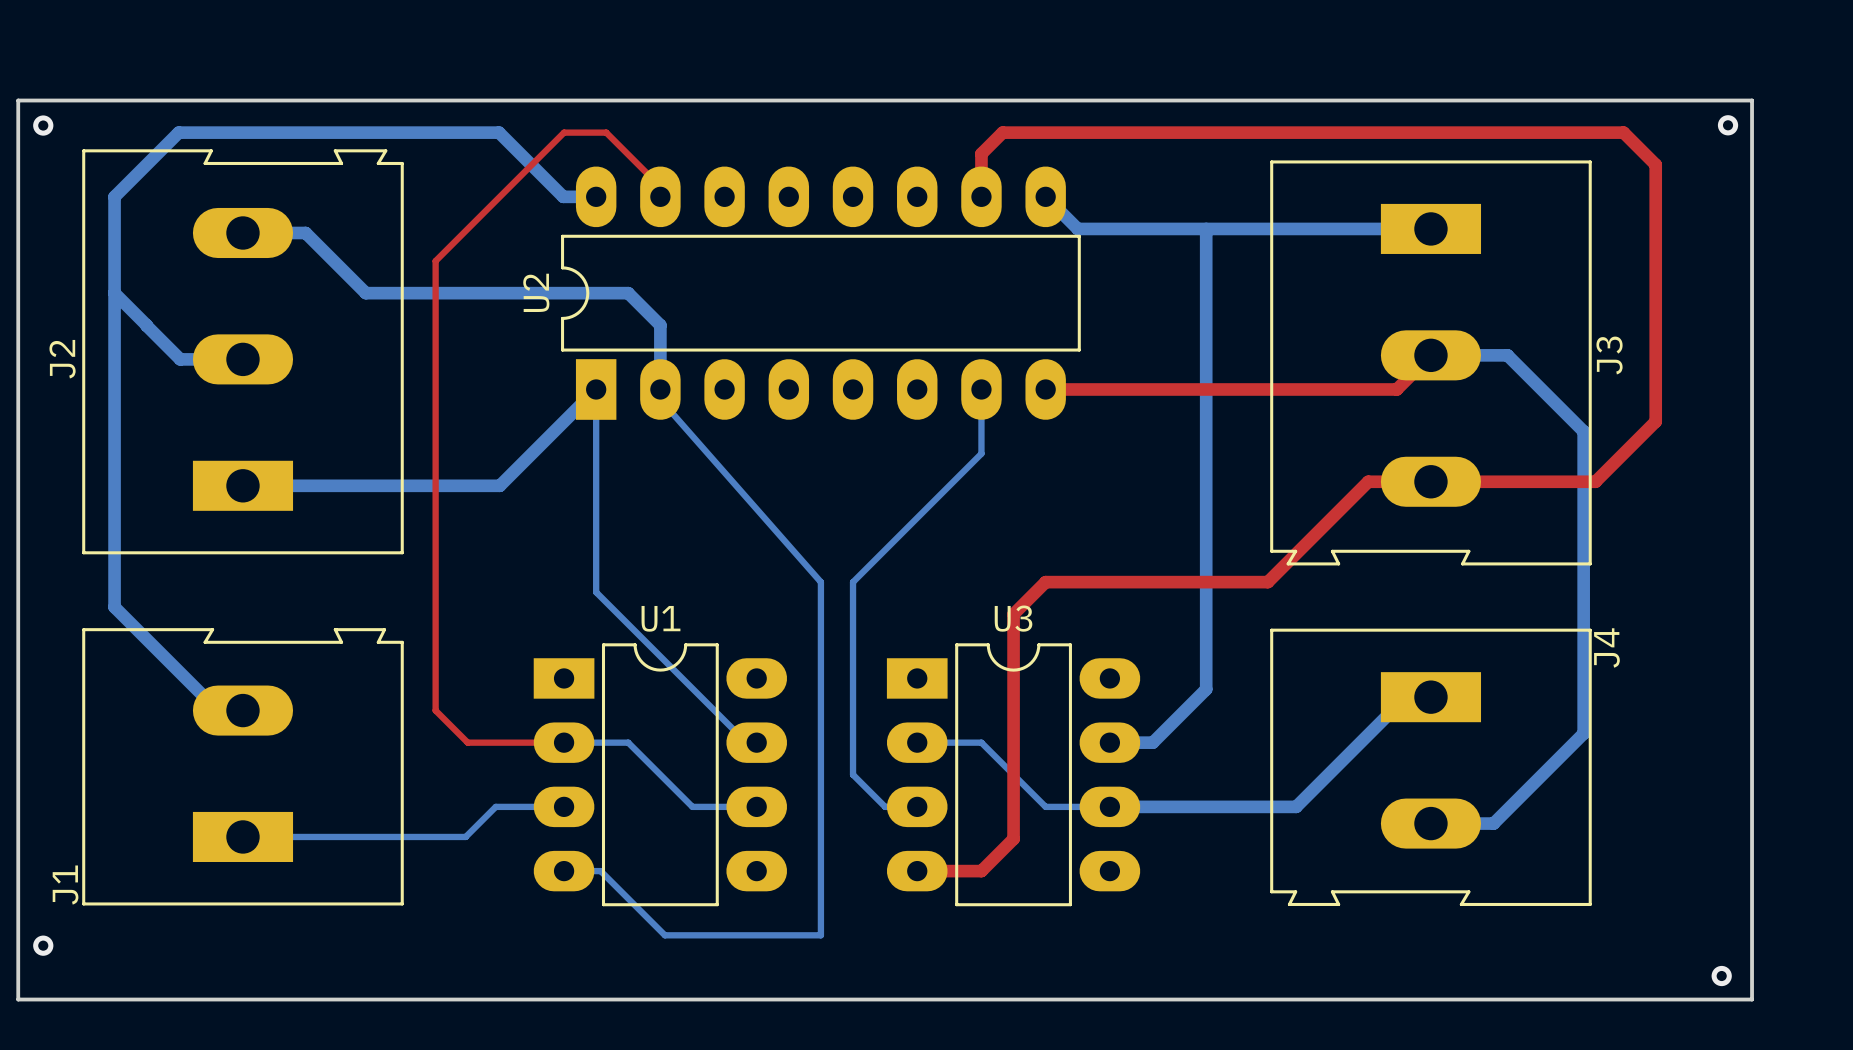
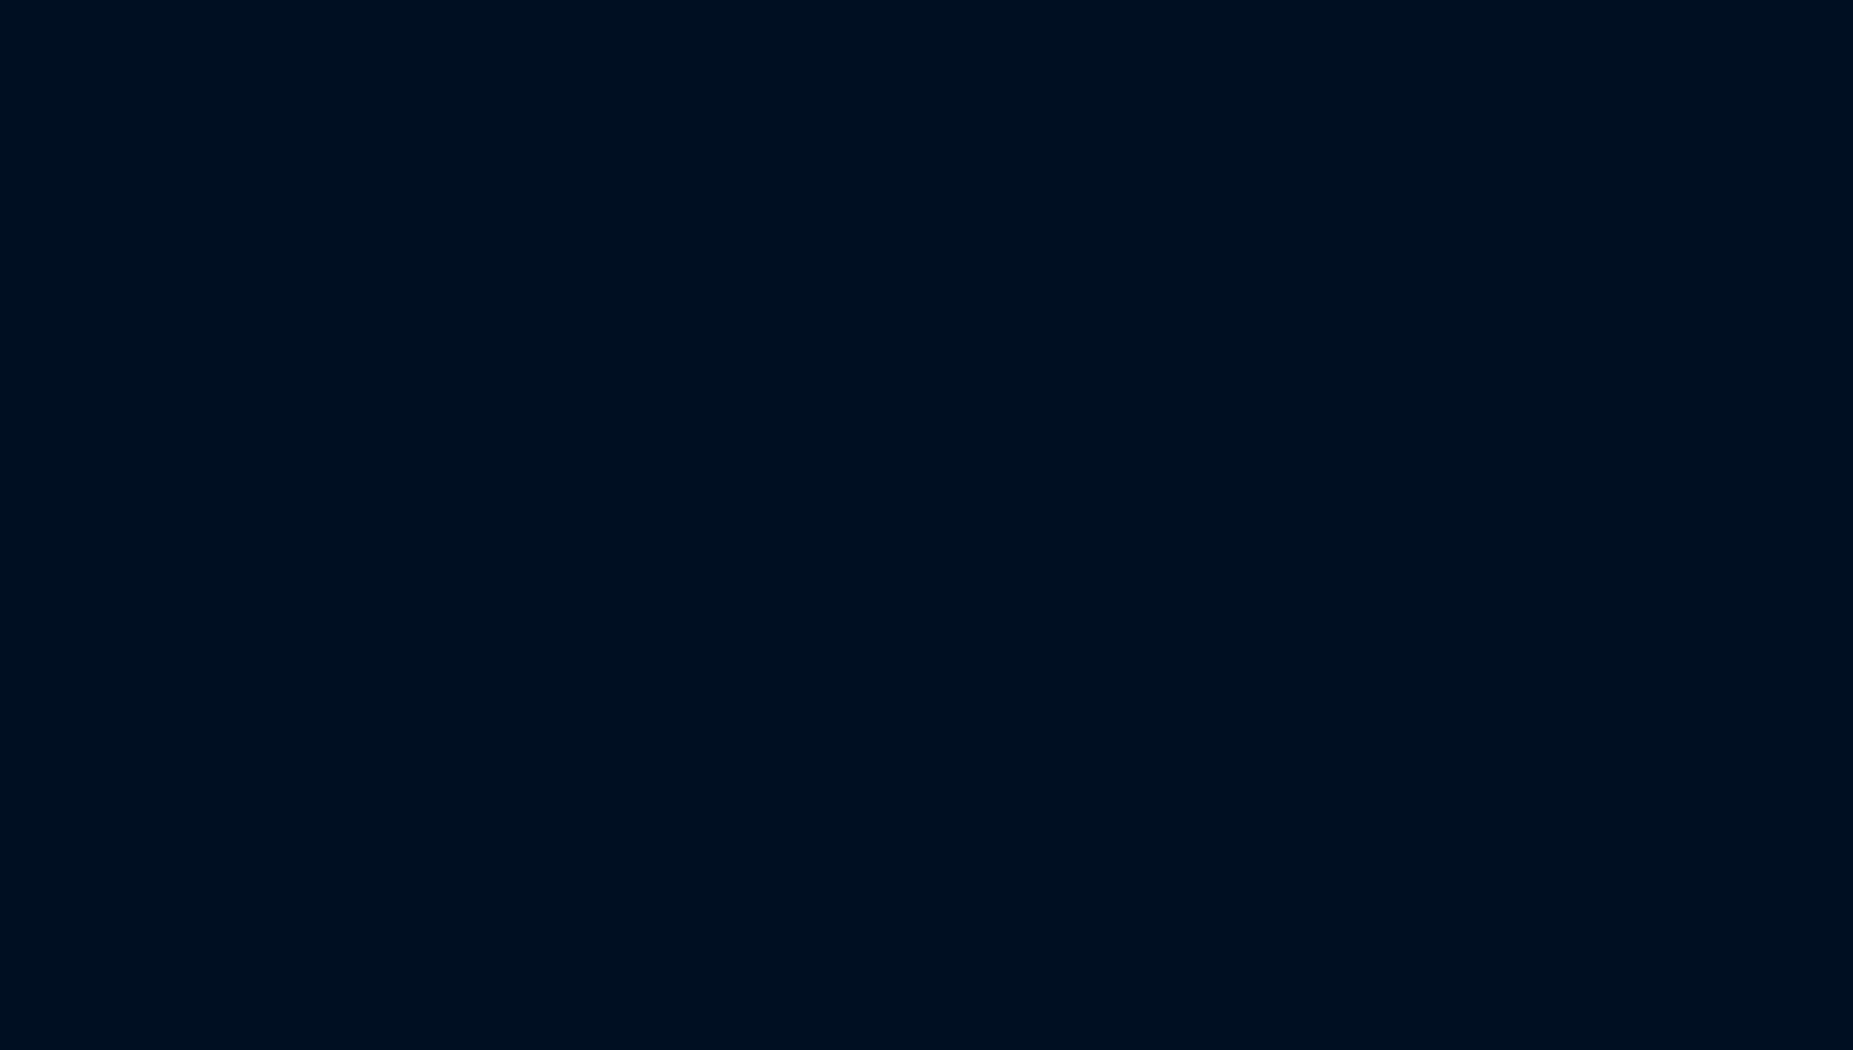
board edge: (18, 100) (18, 999) (1752, 999) (1752, 100) (18, 100) -> none
via: (43, 125) -> none
via: (1728, 125) -> none
bottom track: (596, 196) (563, 196) (499, 132) (178, 132) (114, 196) (114, 607) (217, 710) (242, 710) -> none
top track: (660, 196) (660, 186) (606, 132) (564, 132) (435, 261) (435, 710) (467, 742) (564, 742) -> none
top track: (981, 196) (981, 153) (1002, 132) (1623, 132) (1655, 164) (1655, 421) (1595, 481) (1368, 481) (1267, 582) (1045, 582) (1013, 614) (1013, 838) (981, 871) (917, 871) -> none
bottom track: (1045, 196) (1077, 228) (1430, 228) -> none
bottom track: (1206, 228) (1206, 689) (1152, 742) (1109, 742) -> none
bottom track: (242, 232) (305, 232) (365, 293) (628, 293) (660, 325) (660, 399) (820, 582) (820, 935) (664, 935) (600, 871) (564, 871) -> none
bottom track: (114, 293) (180, 359) (242, 359) -> none
U2: (820, 293) -> none
J2: (242, 351) -> none
bottom track: (1430, 355) (1507, 355) (1583, 431) (1583, 733) (1493, 823) (1430, 823) -> none
top track: (1430, 355) (1396, 389) (1045, 389) -> none
J3: (1430, 362) -> none
bottom track: (981, 389) (981, 453) (853, 582) (853, 774) (885, 806) (917, 806) -> none
bottom track: (242, 485) (499, 485) (596, 389) (596, 592) (746, 742) (756, 742) -> none
bottom track: (1430, 697) (1405, 697) (1296, 806) (1045, 806) (981, 742) (917, 742) -> none
bottom track: (564, 742) (628, 742) (692, 806) (756, 806) -> none
J1: (242, 766) -> none
J4: (1430, 767) -> none
U1: (660, 774) -> none
U3: (1013, 774) -> none
bottom track: (564, 806) (495, 806) (465, 836) (242, 836) -> none
via: (43, 945) -> none
via: (1721, 976) -> none

